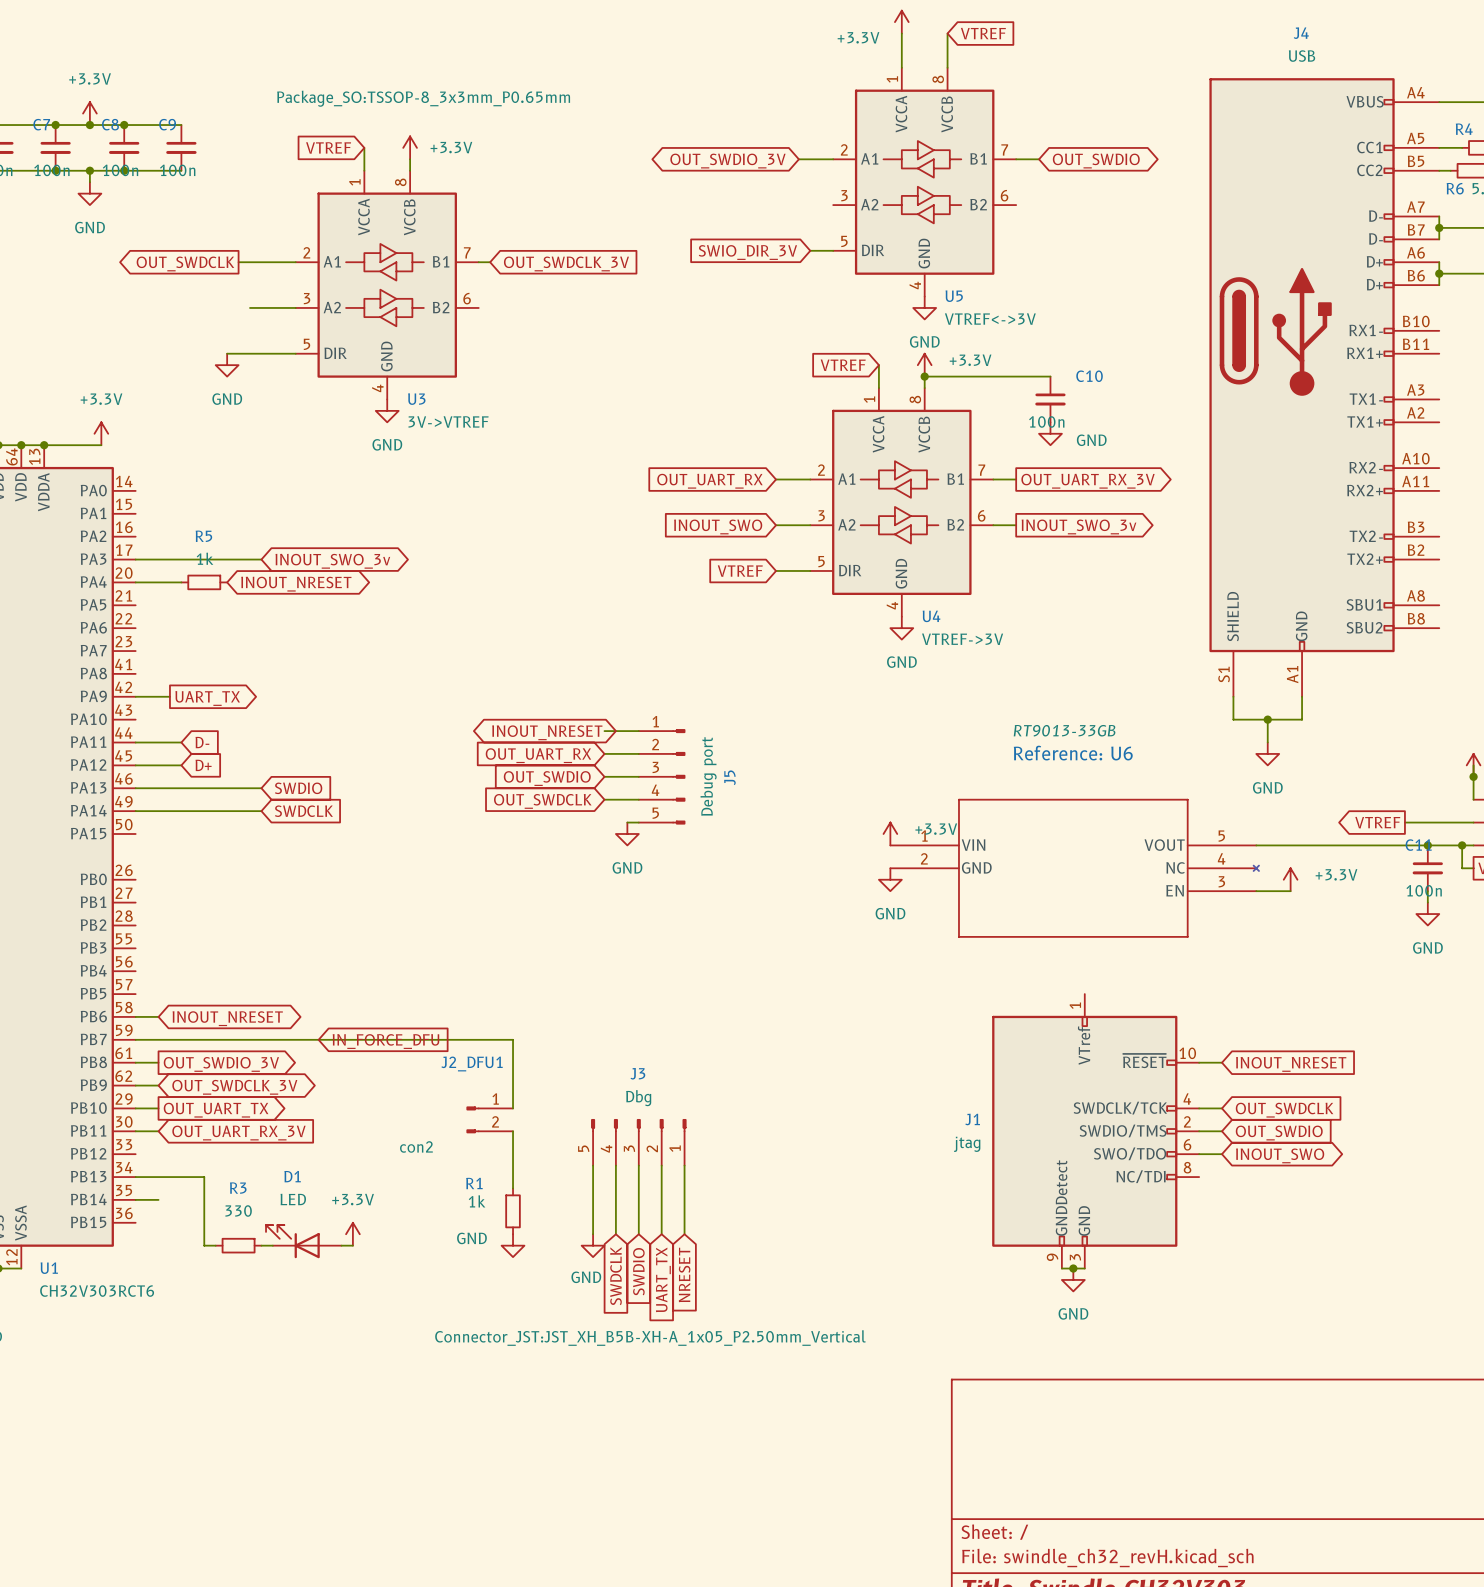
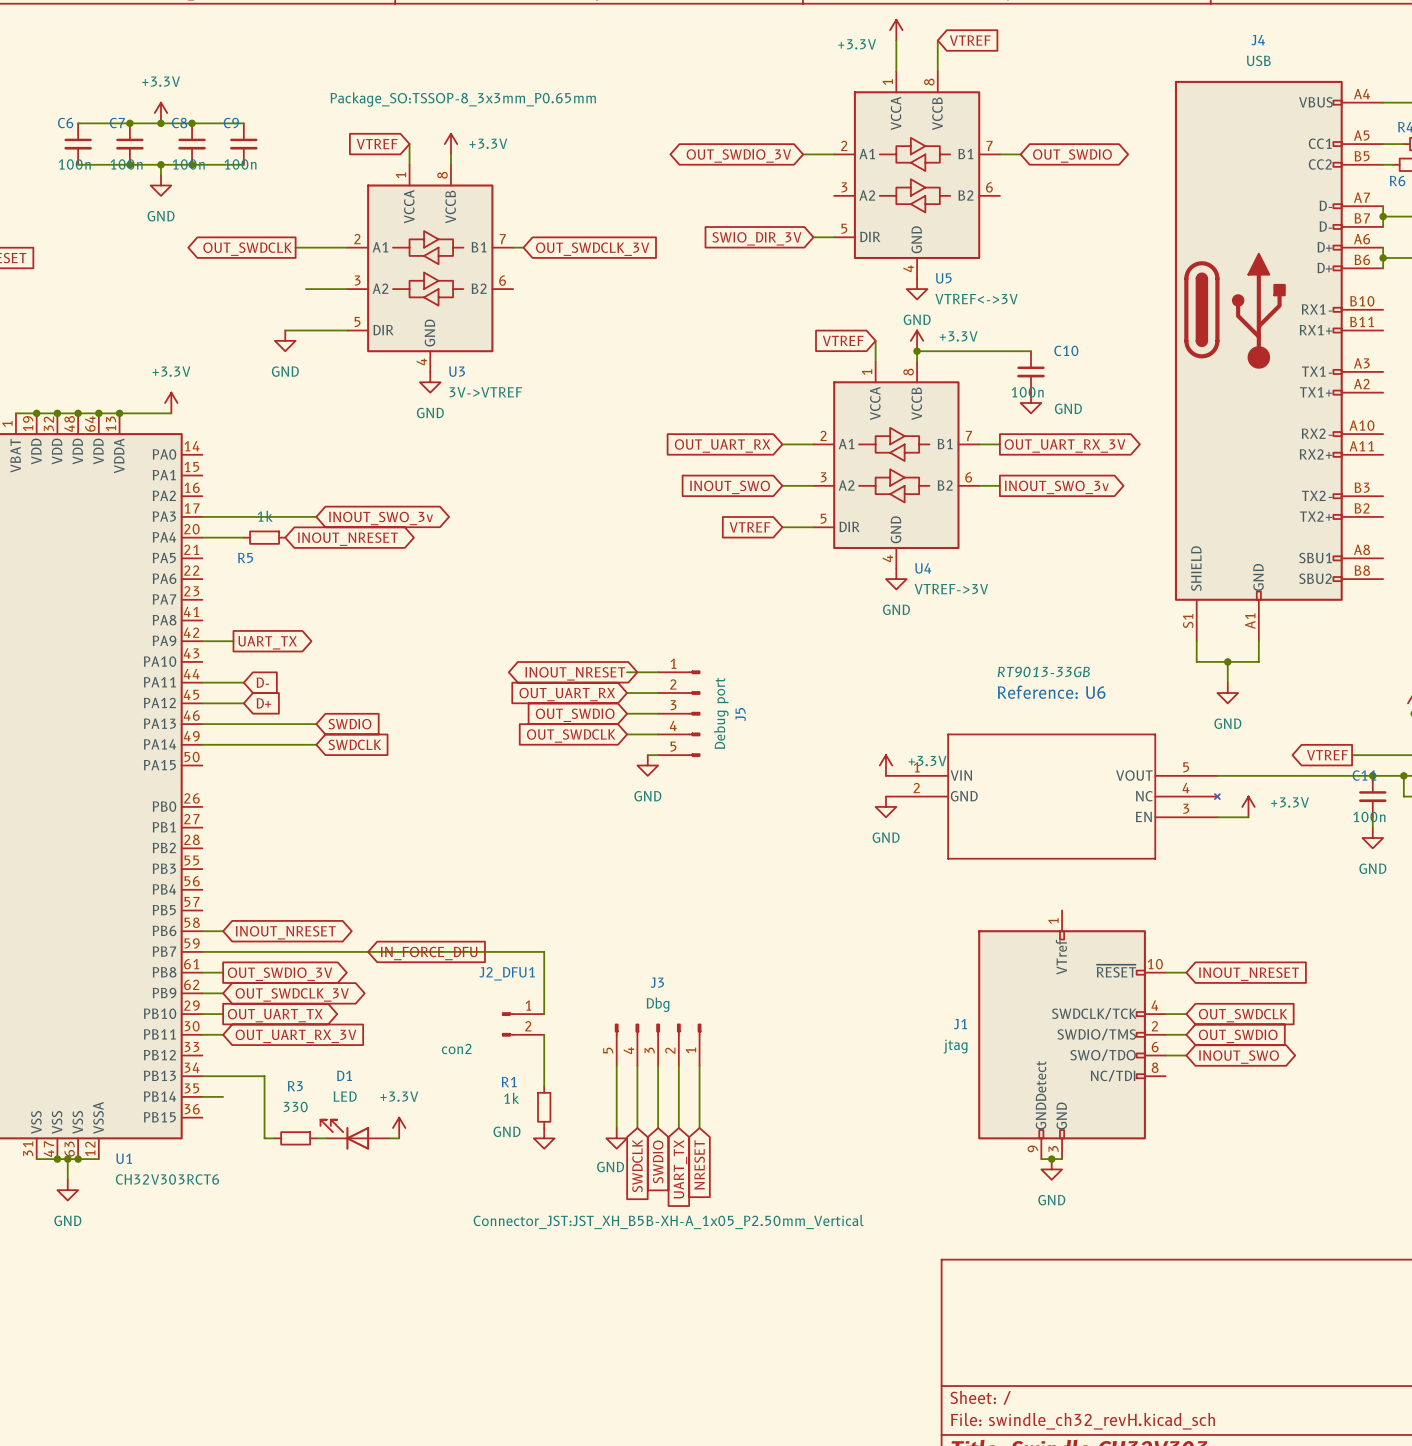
R5 name position: R5 (203, 536) -> R5 (245, 558)

